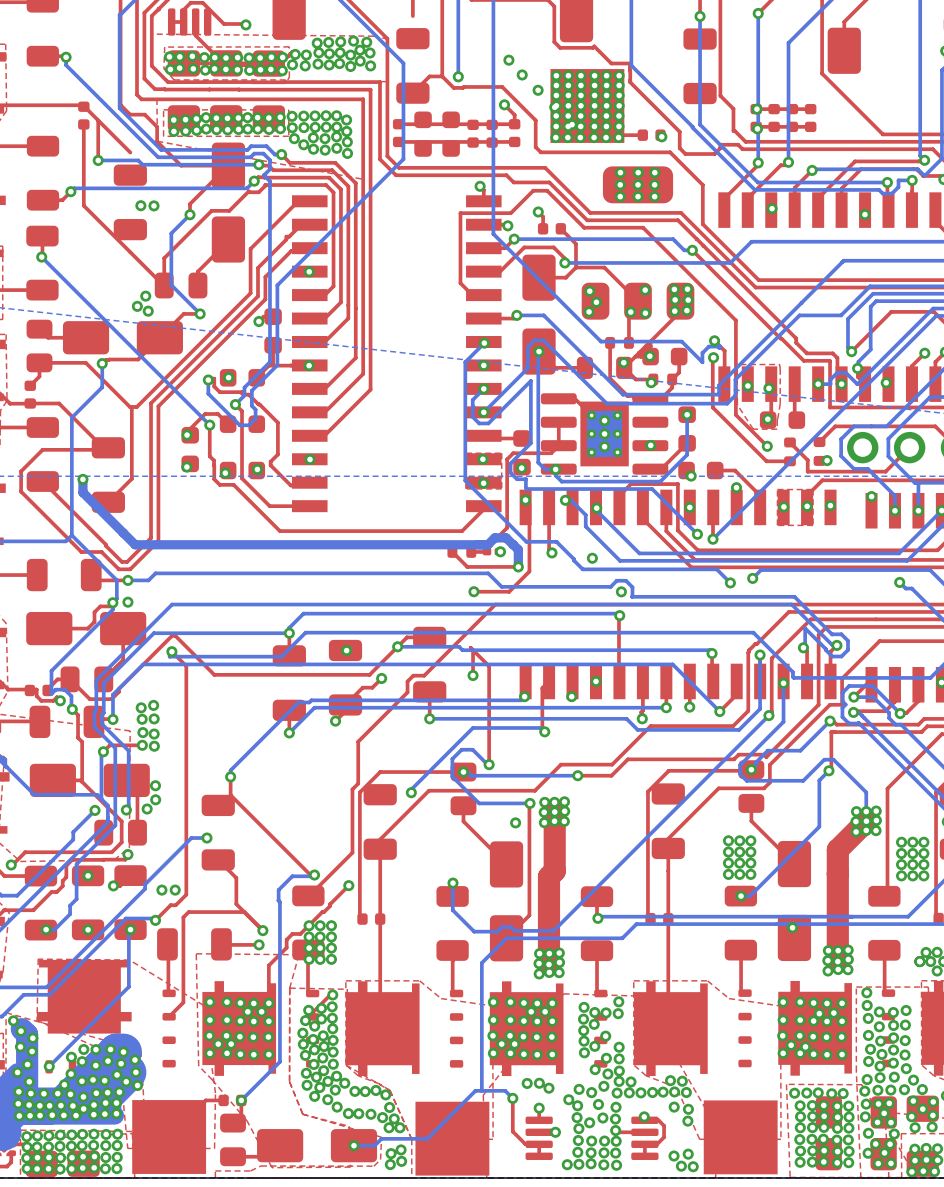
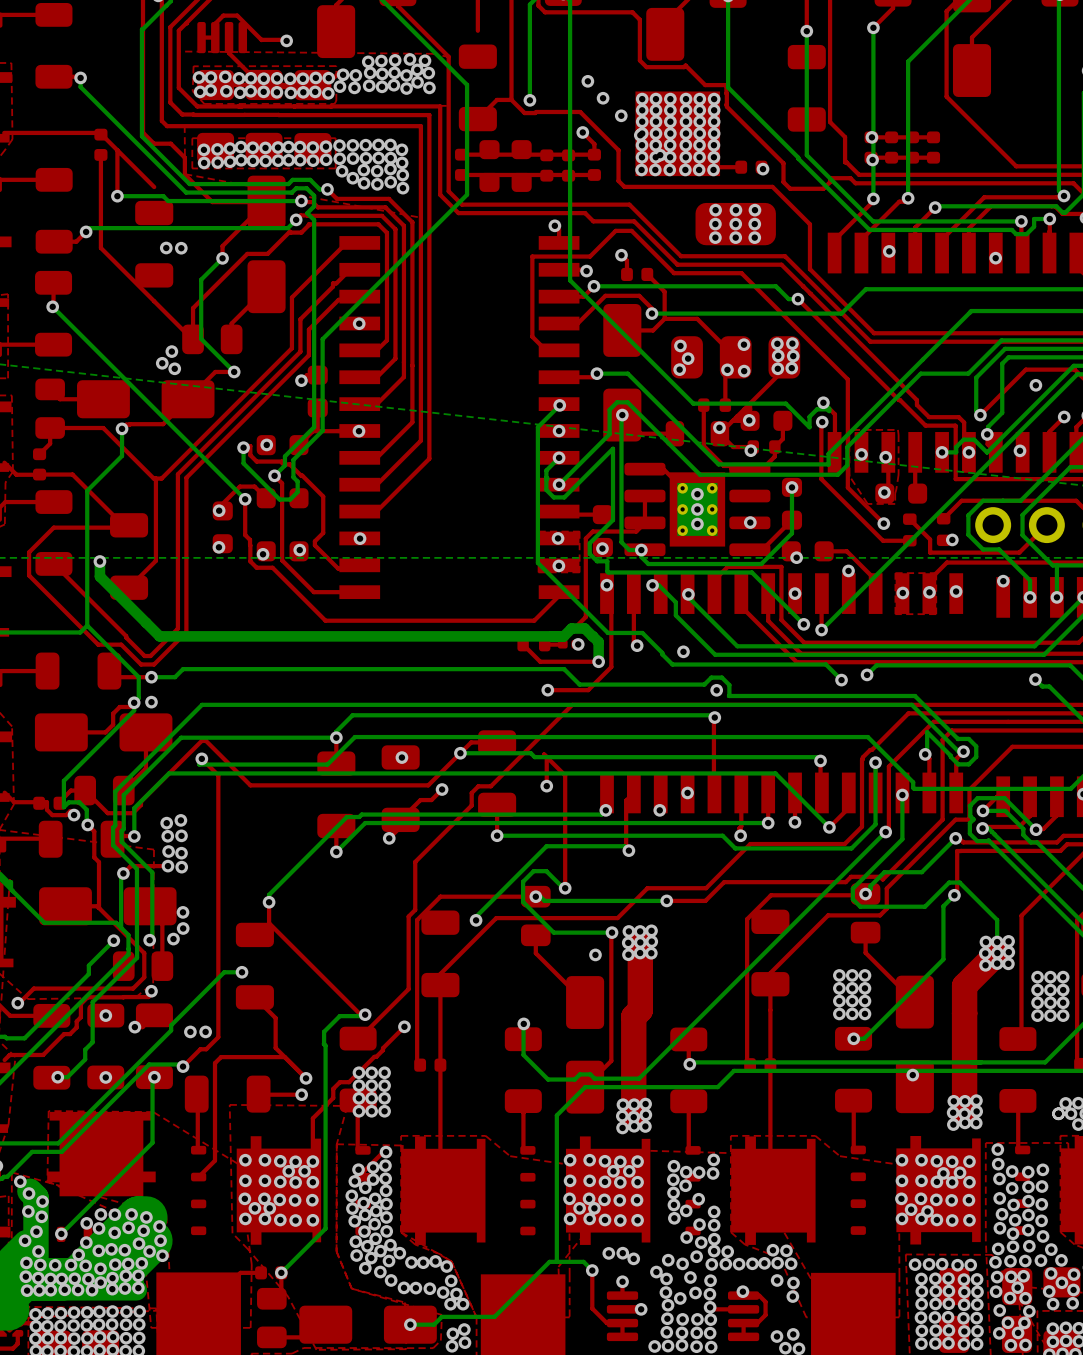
via: none -> (1035, 385)

